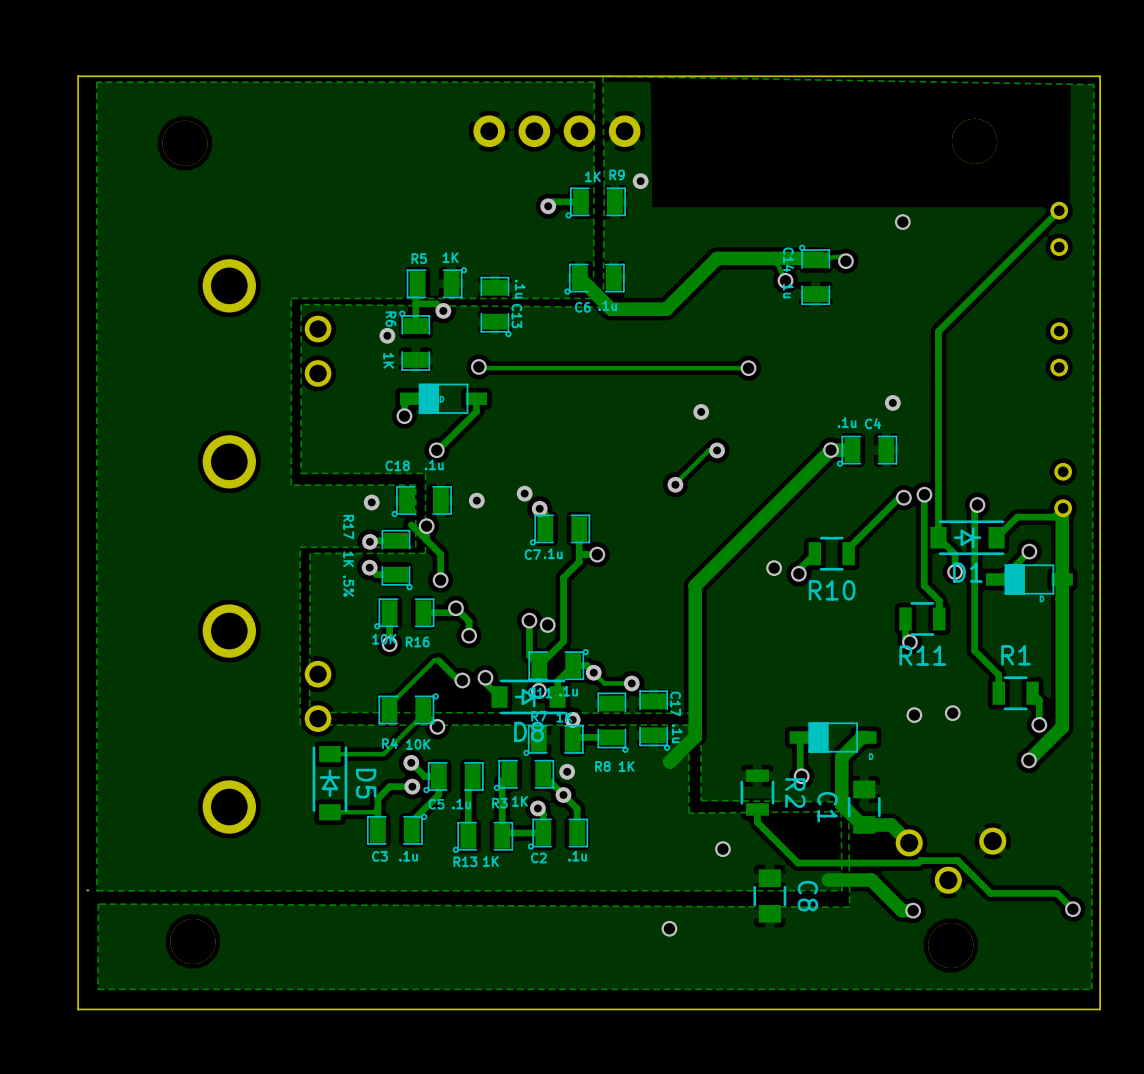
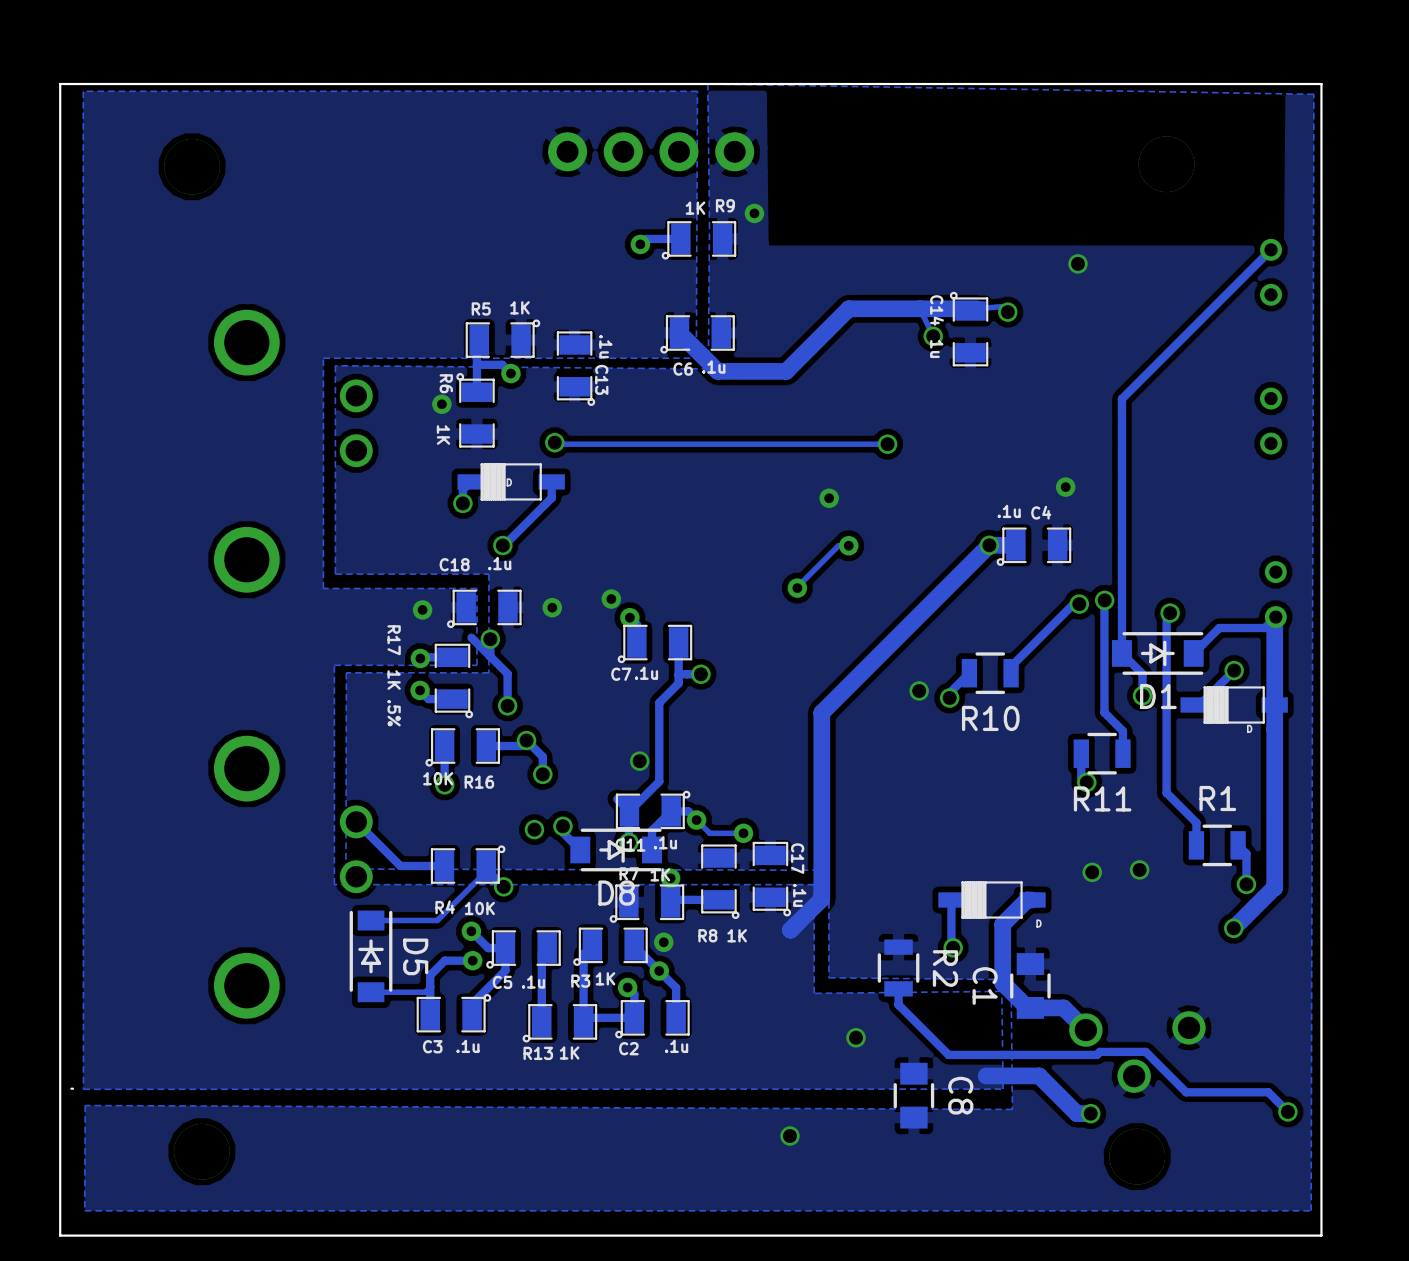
track: (529, 620) (529, 655) -> none
via: (529, 620) -> none
track: none -> (356, 821) (400, 866) (444, 866)
track: (458, 680) (438, 660) (434, 660) (389, 705) -> none

